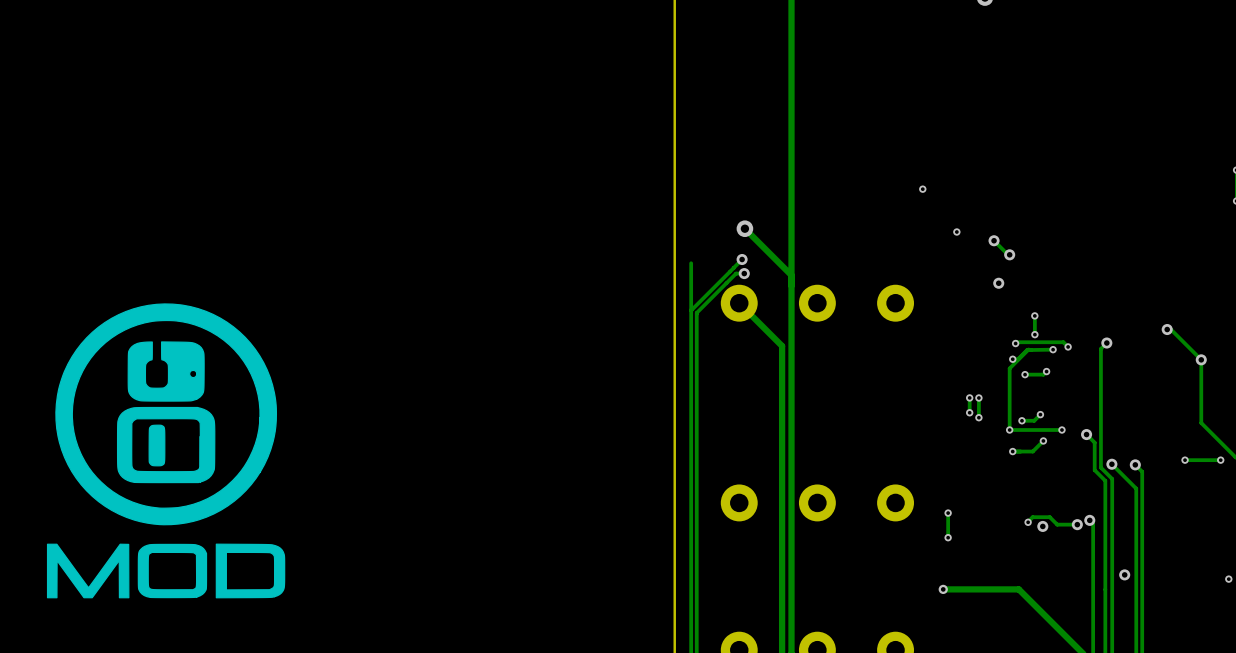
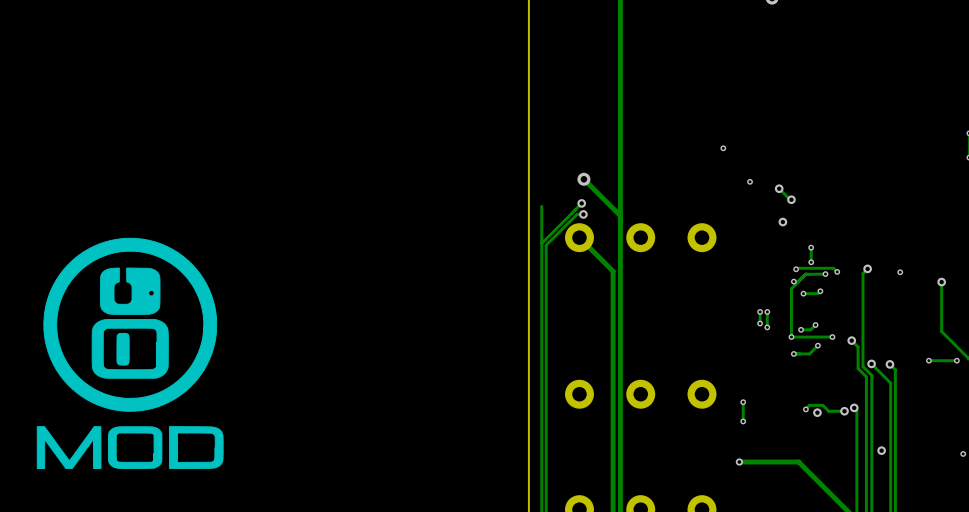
track: (1167, 329) (1170, 329) (1201, 359) -> none
via: (1167, 329) -> none
via: none -> (900, 272)

